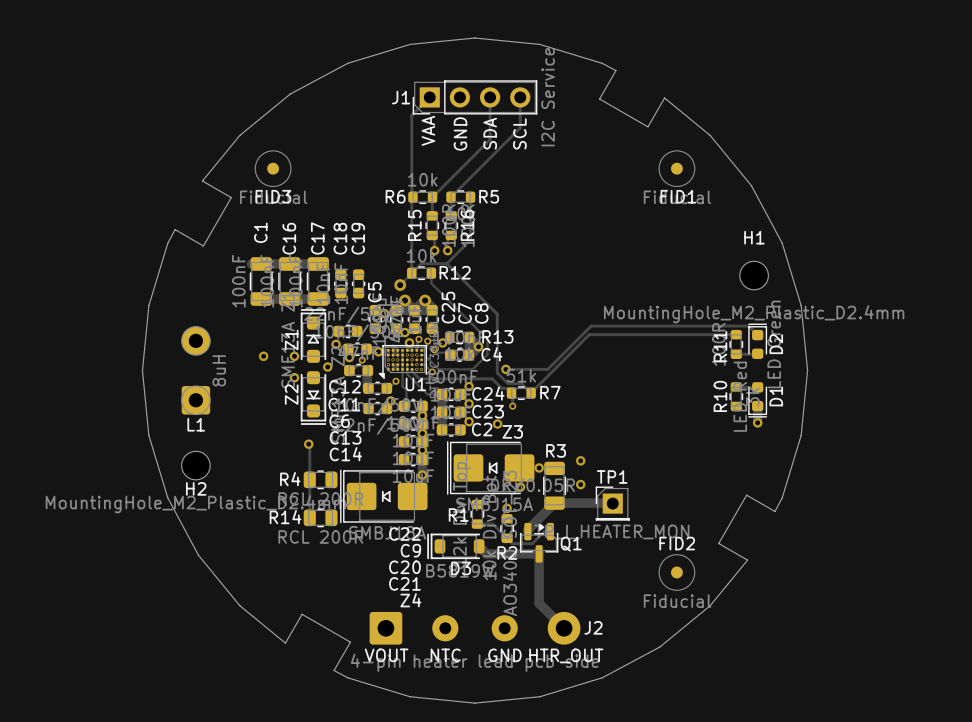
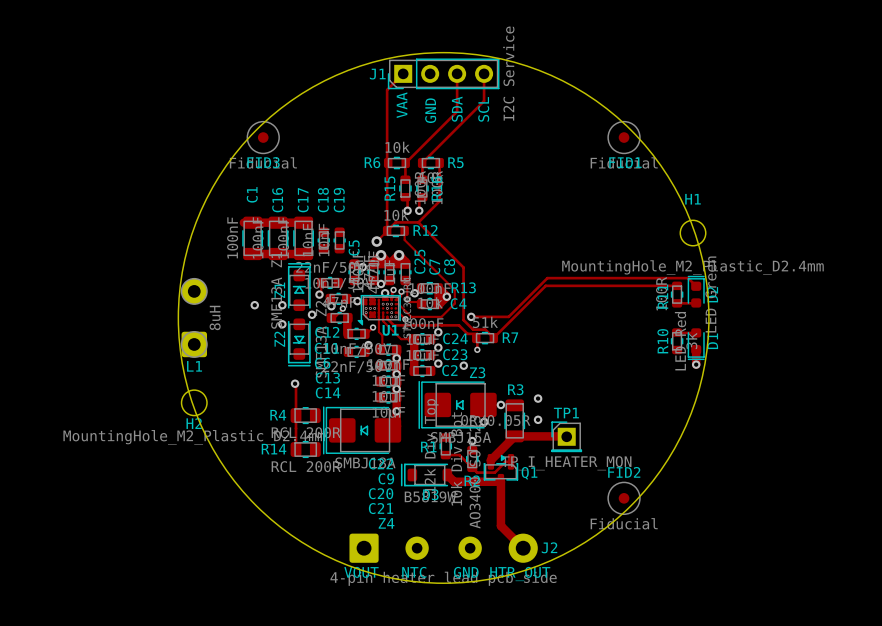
board edge: (475, 38) (410, 44) (347, 63) (290, 94) (239, 135) (202, 180) (231, 197) (203, 245) (175, 229) (167, 243) (148, 305) (142, 370) (148, 435) (167, 497) (198, 555) (239, 605) (285, 643) (302, 614) (350, 642) (334, 670) (347, 677) (410, 696) (475, 703) (539, 696) (602, 677) (659, 647) (710, 605) (747, 560) (718, 543) (746, 495) (774, 511) (782, 497) (801, 435) (807, 370) (801, 305) (782, 243) (751, 185) (710, 135) (664, 98) (647, 126) (599, 98) (615, 70) (602, 63) (539, 44) (475, 38) -> none
round board edge: none -> [177, 52, 710, 584]

